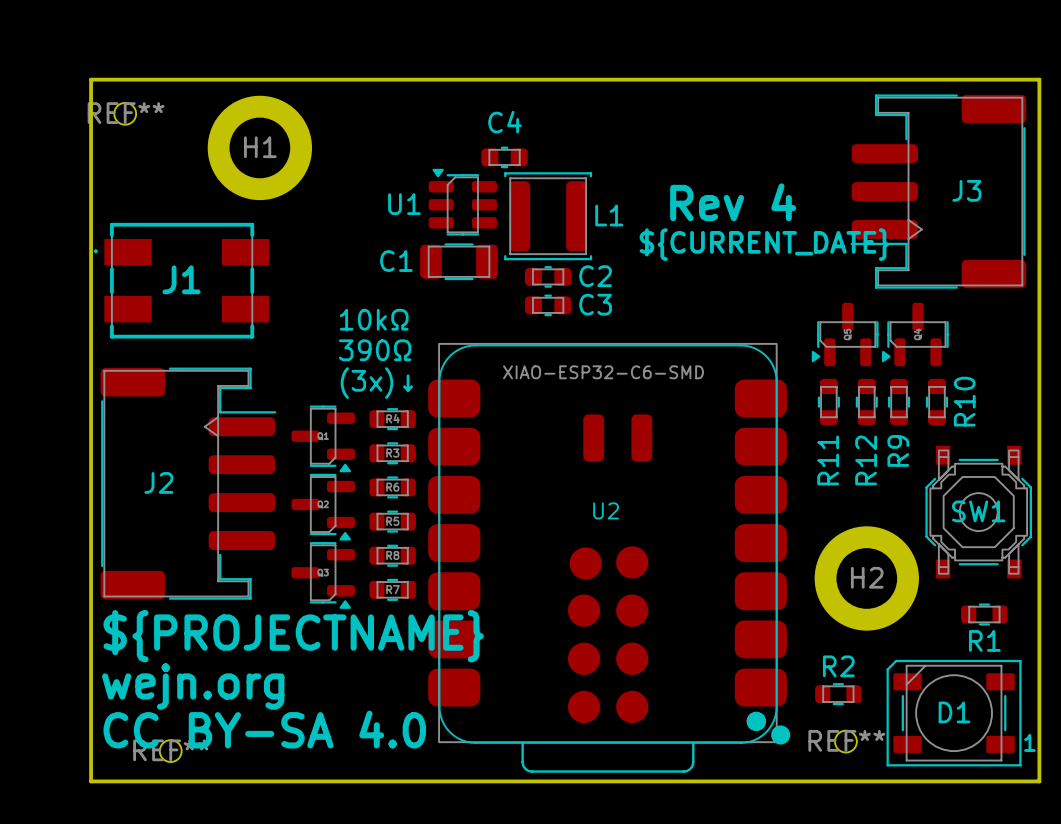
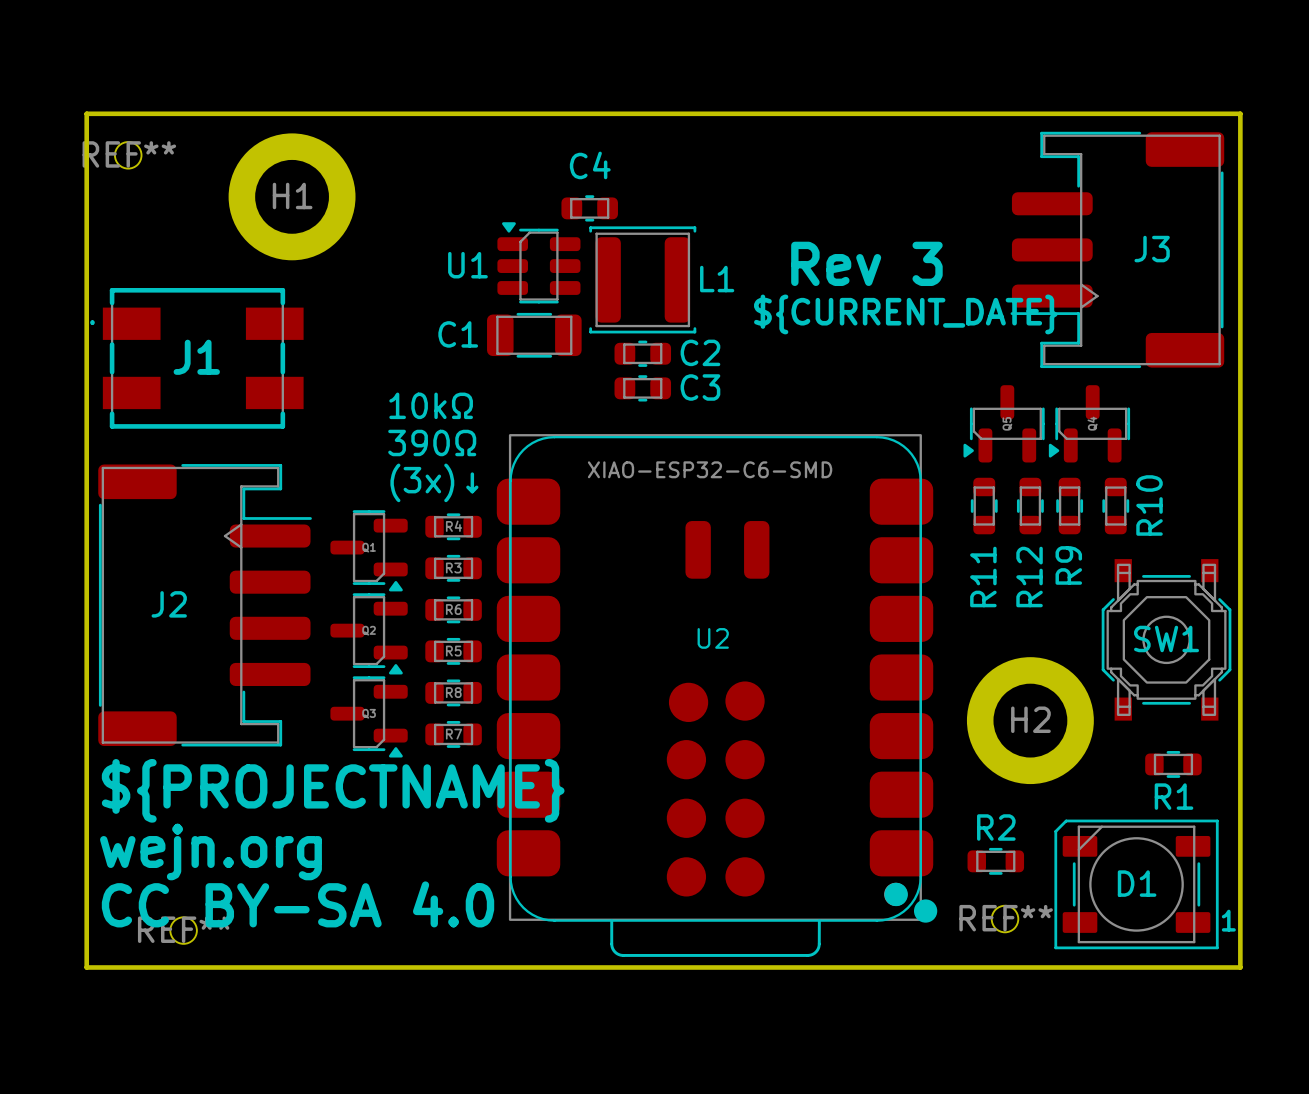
text: Rev 4 (733, 202) -> Rev 3 (866, 263)

